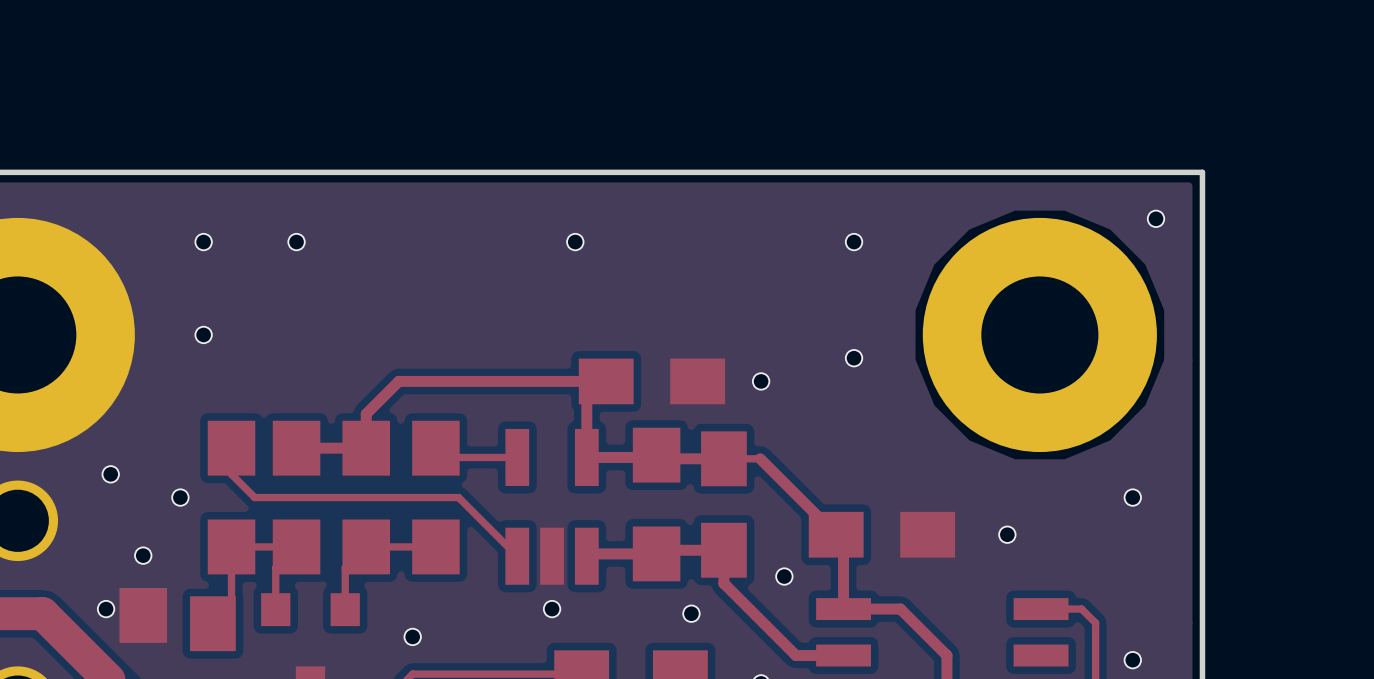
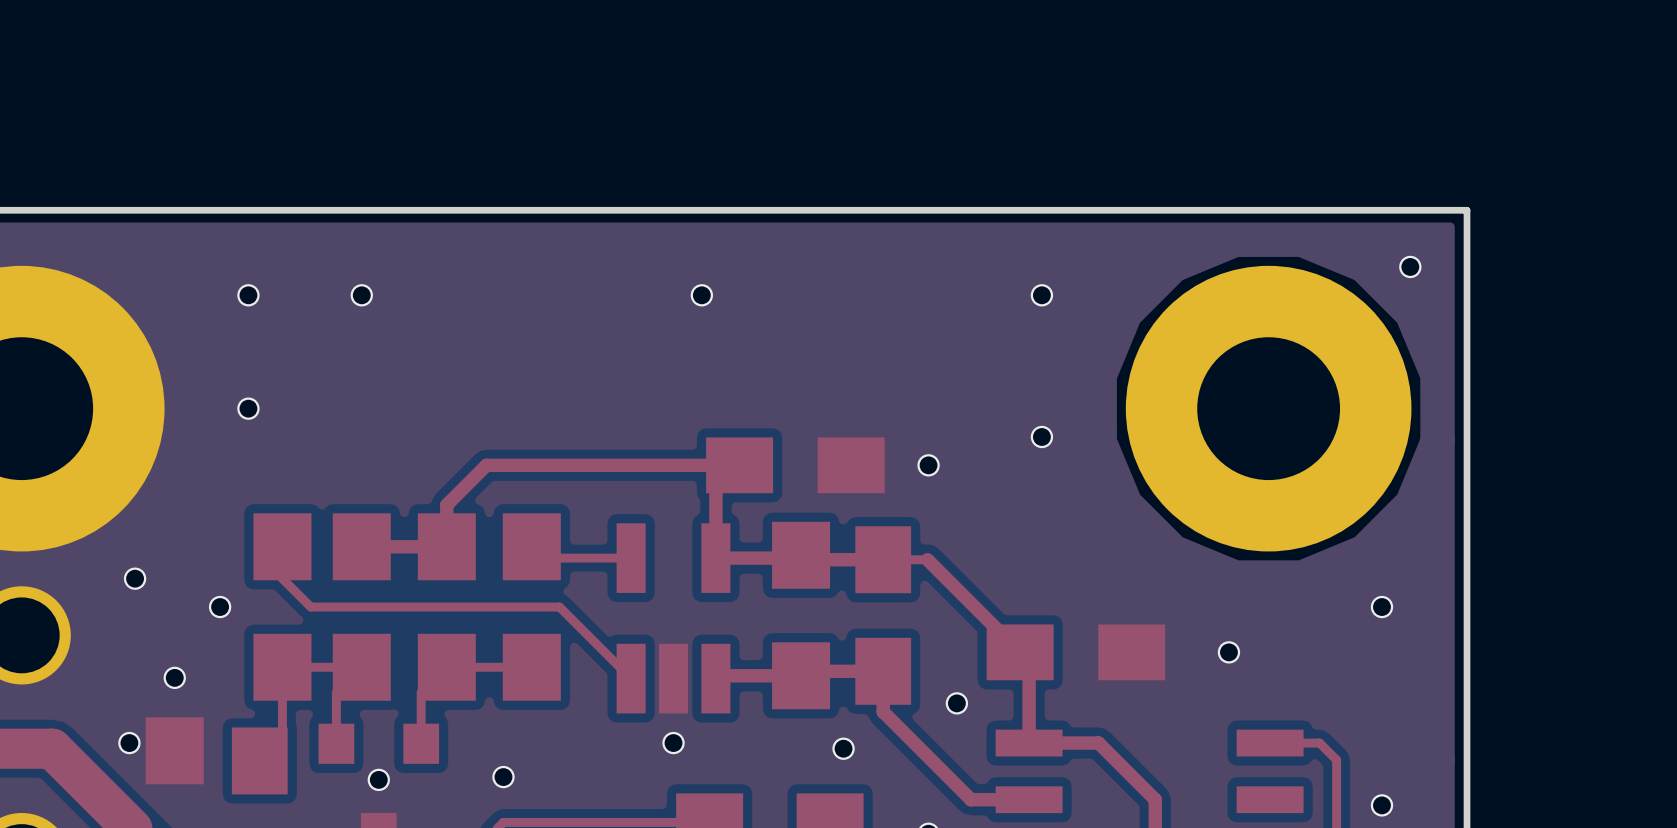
via: none -> (378, 779)

